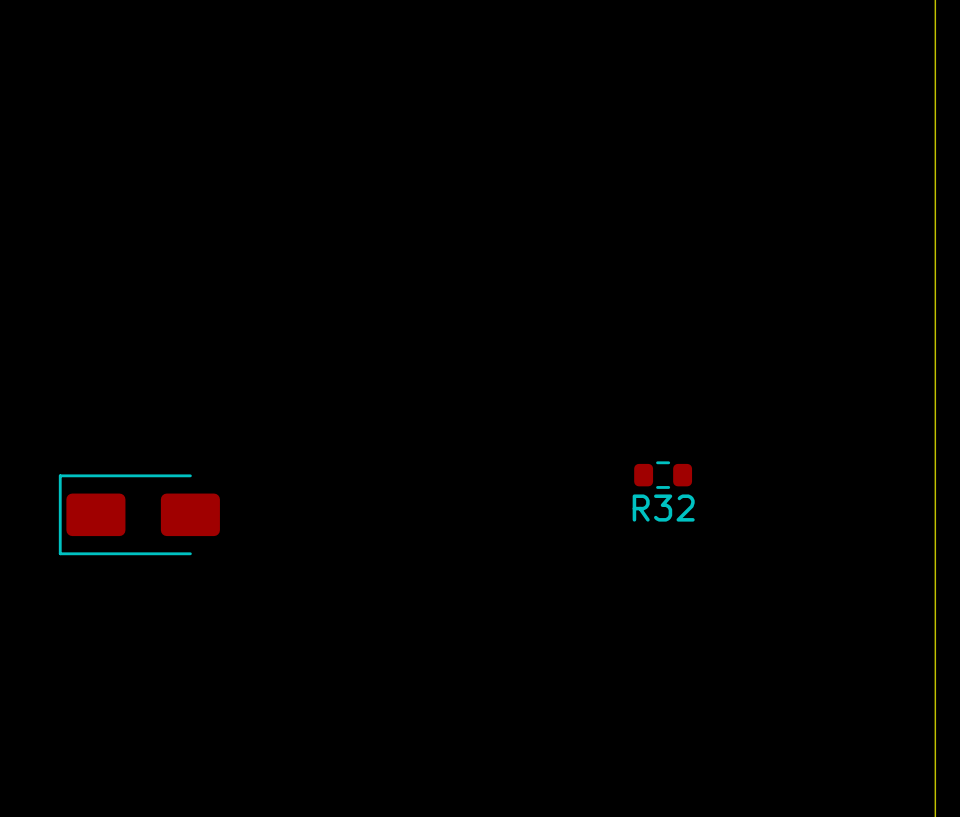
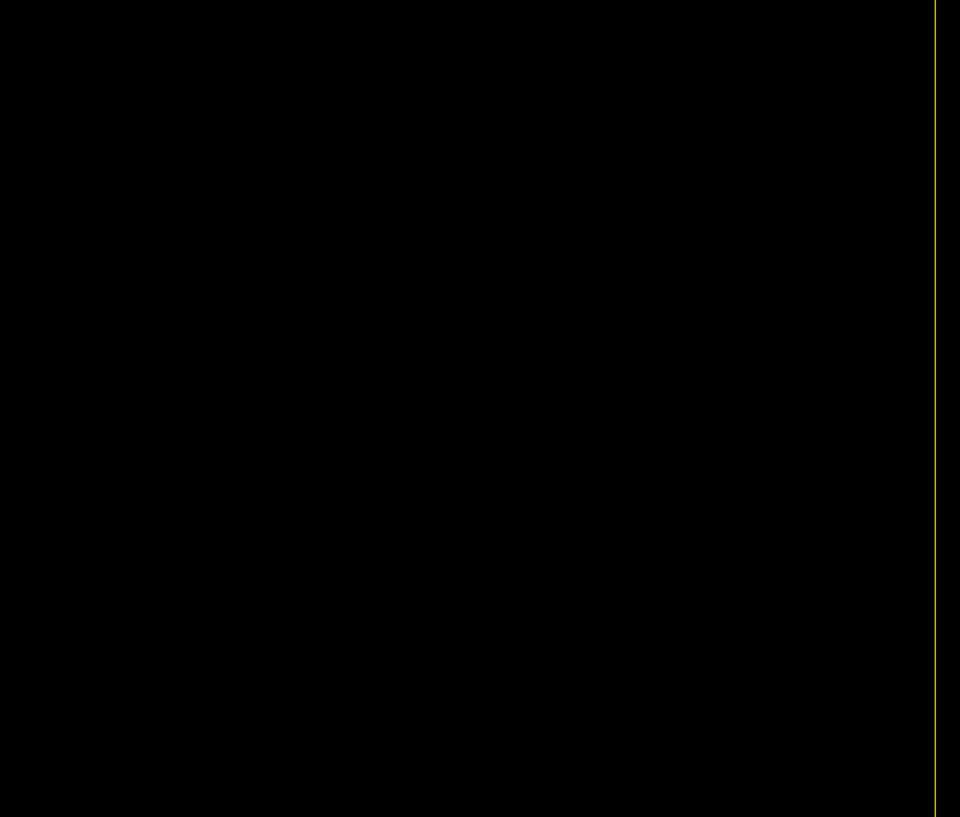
R32: (663, 475) -> none
part: (139, 514) -> none

